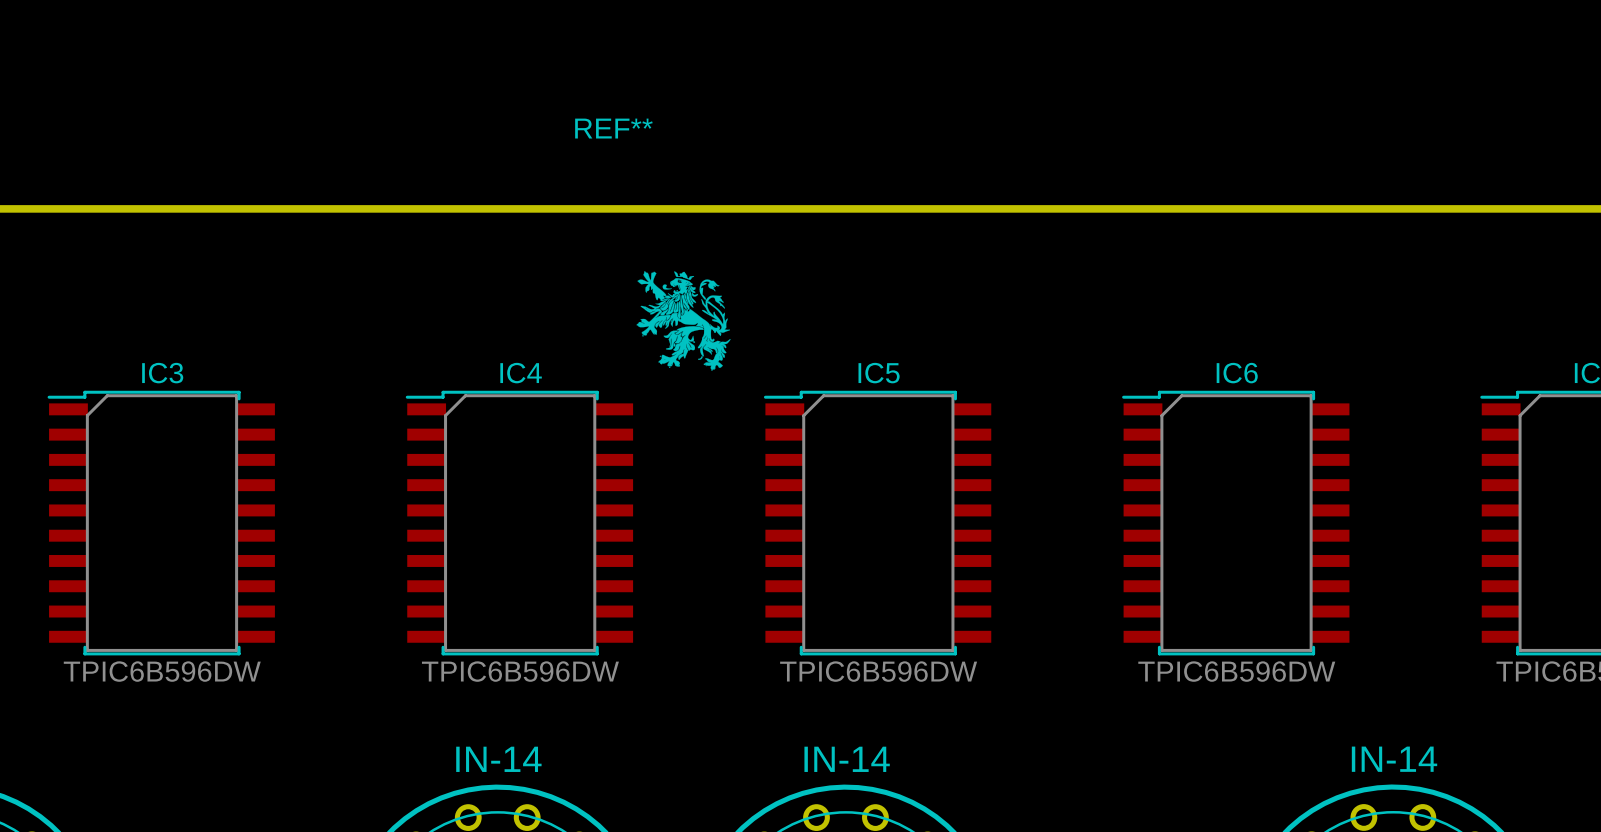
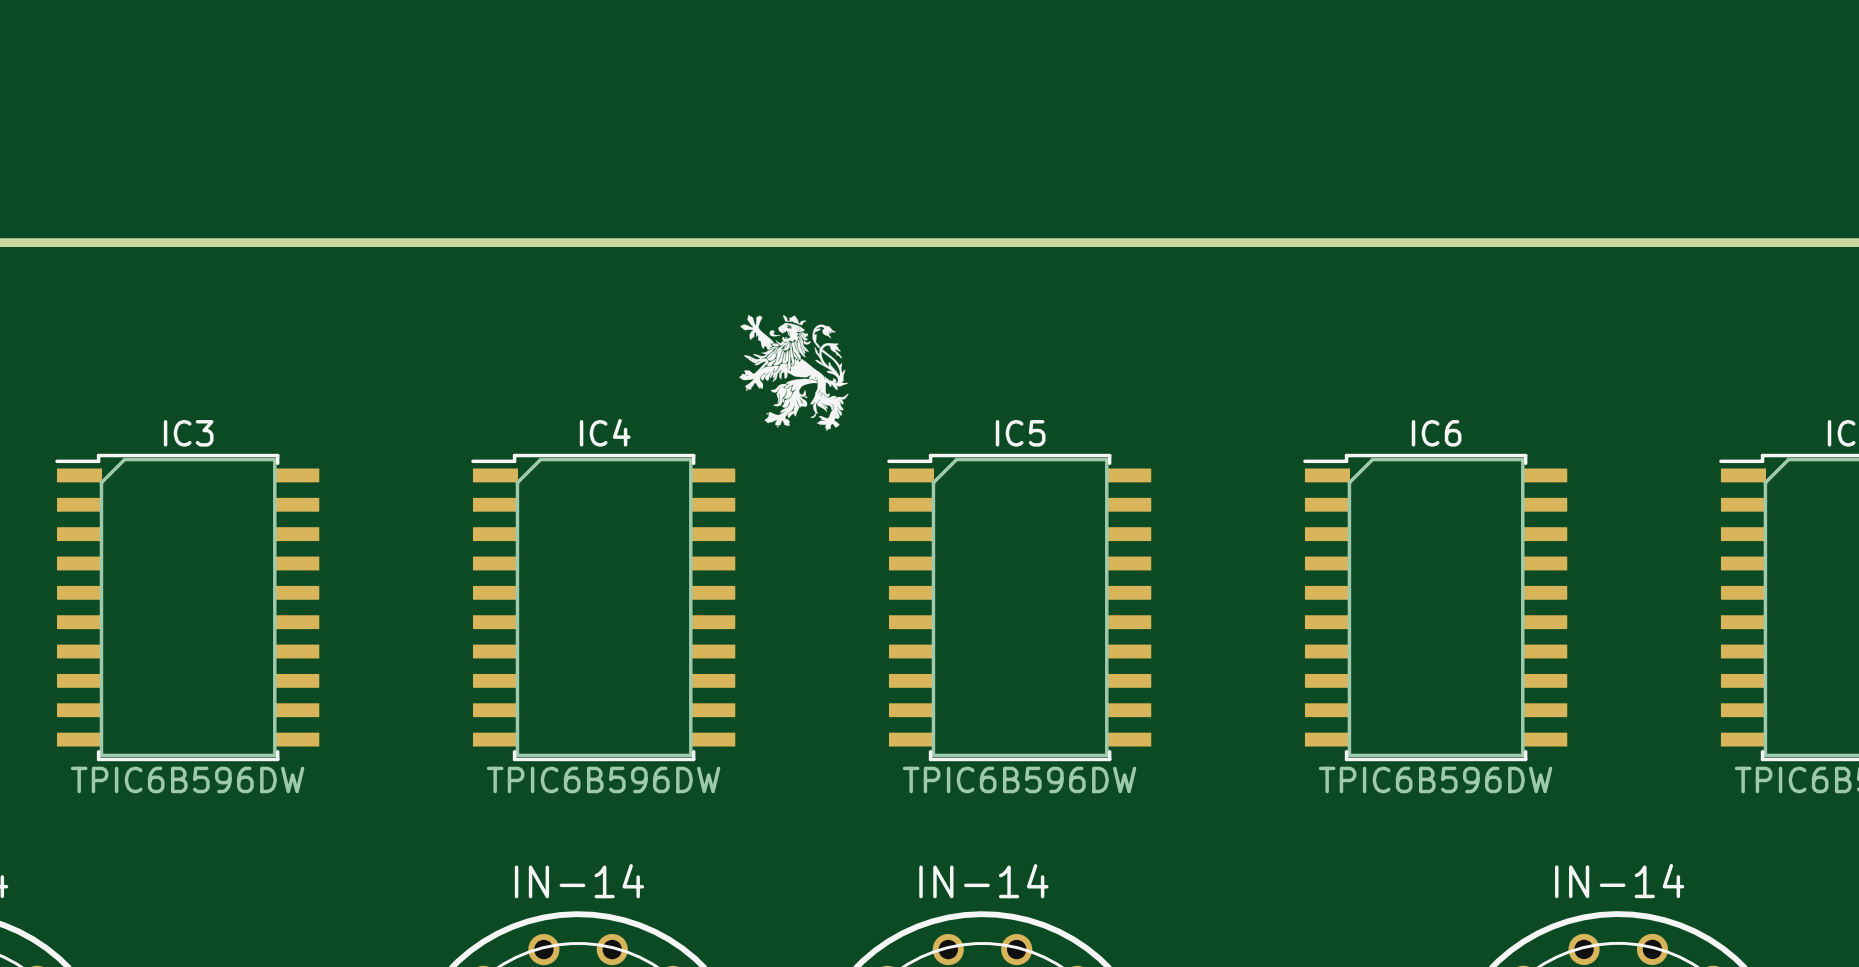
REF** name: REF** (613, 128) -> none

